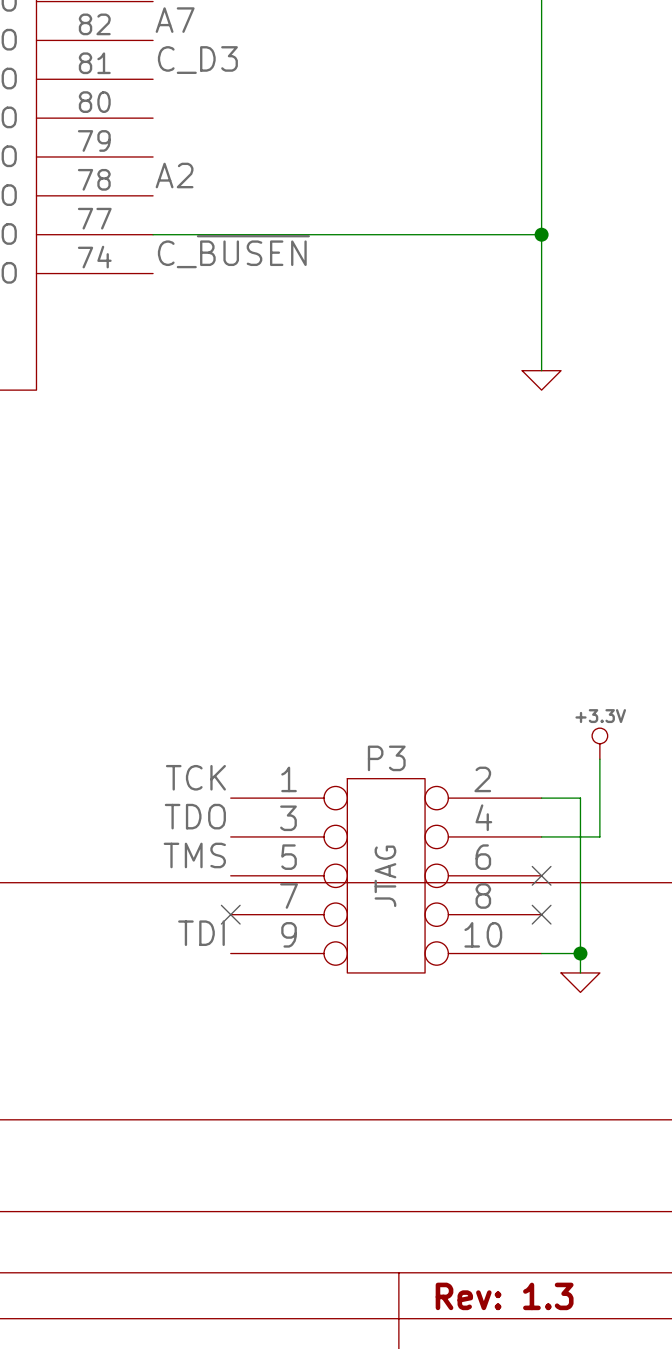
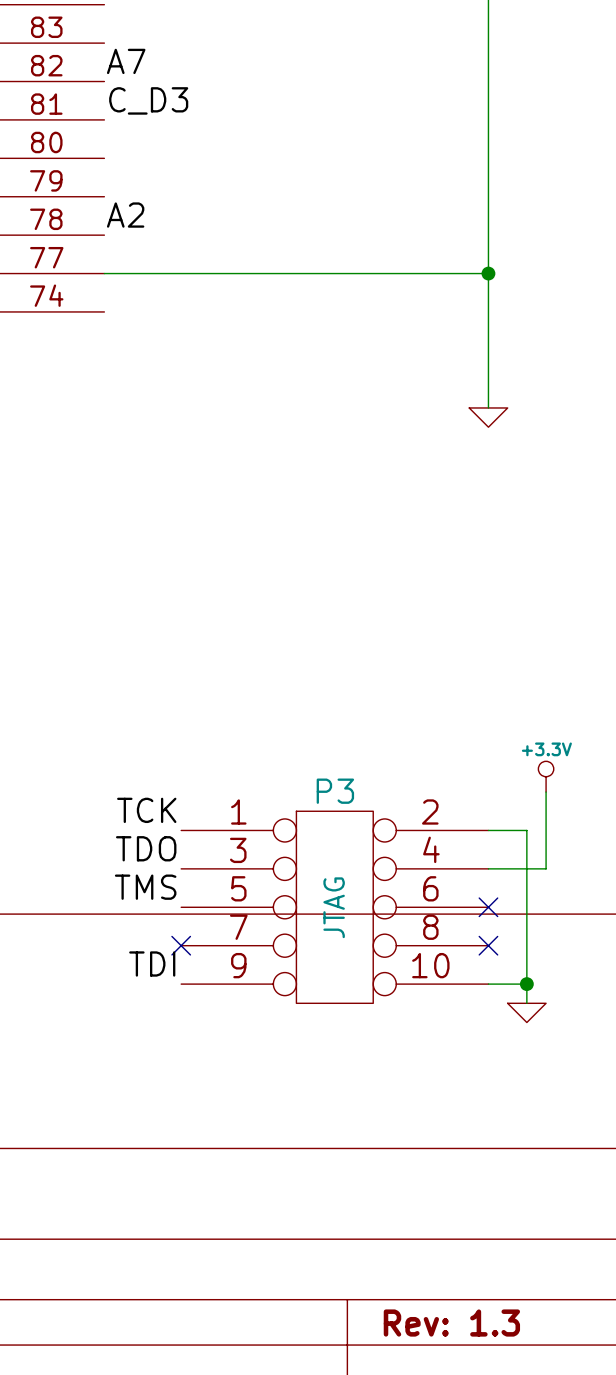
label: C_~{BUSEN} (233, 251) -> none

